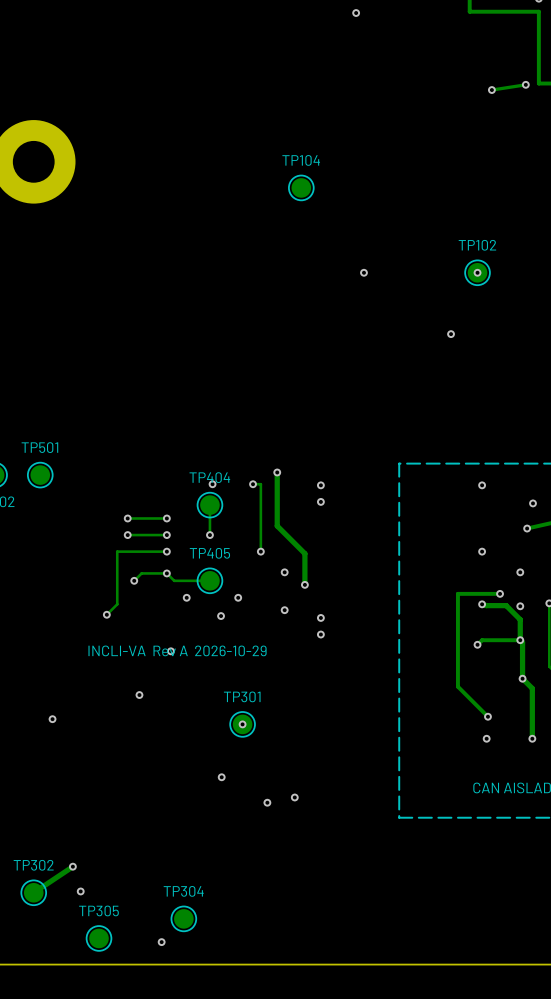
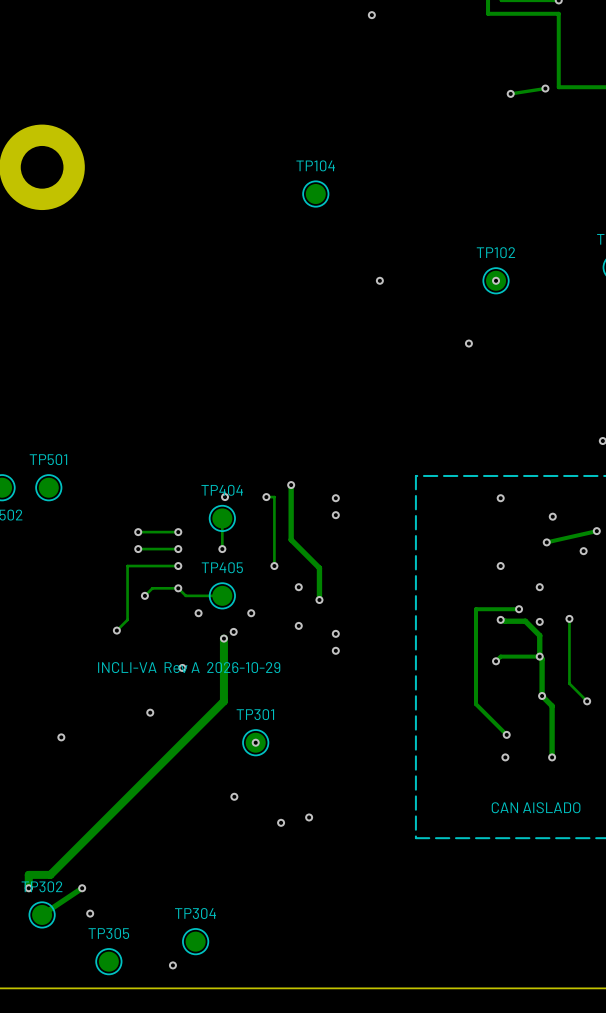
track: none -> (223, 638) (223, 701) (50, 874) (28, 874) (28, 888)
via: none -> (223, 638)
via: none -> (28, 888)

